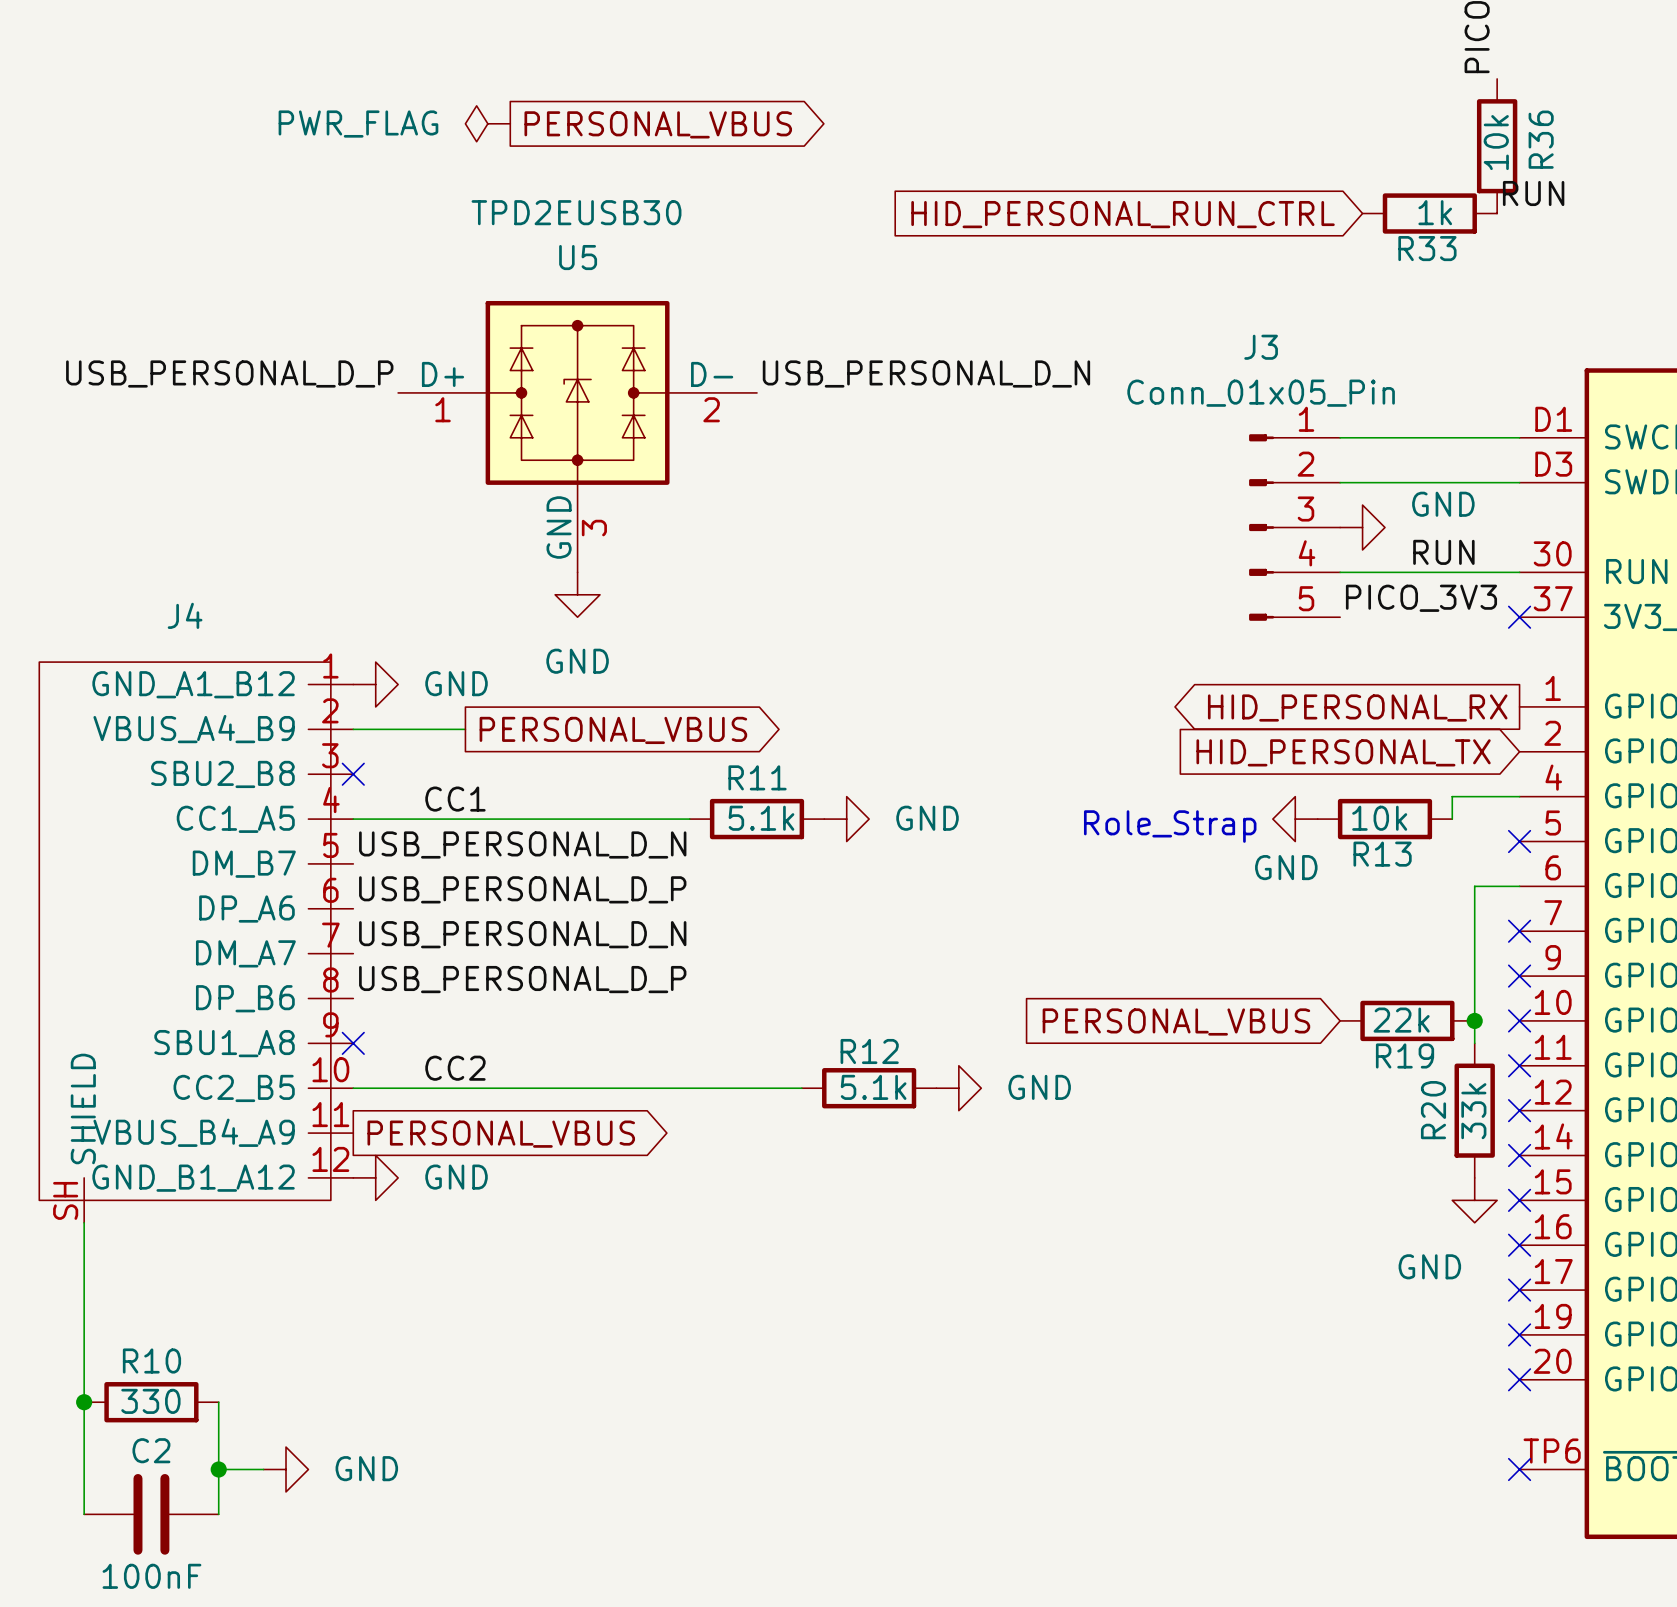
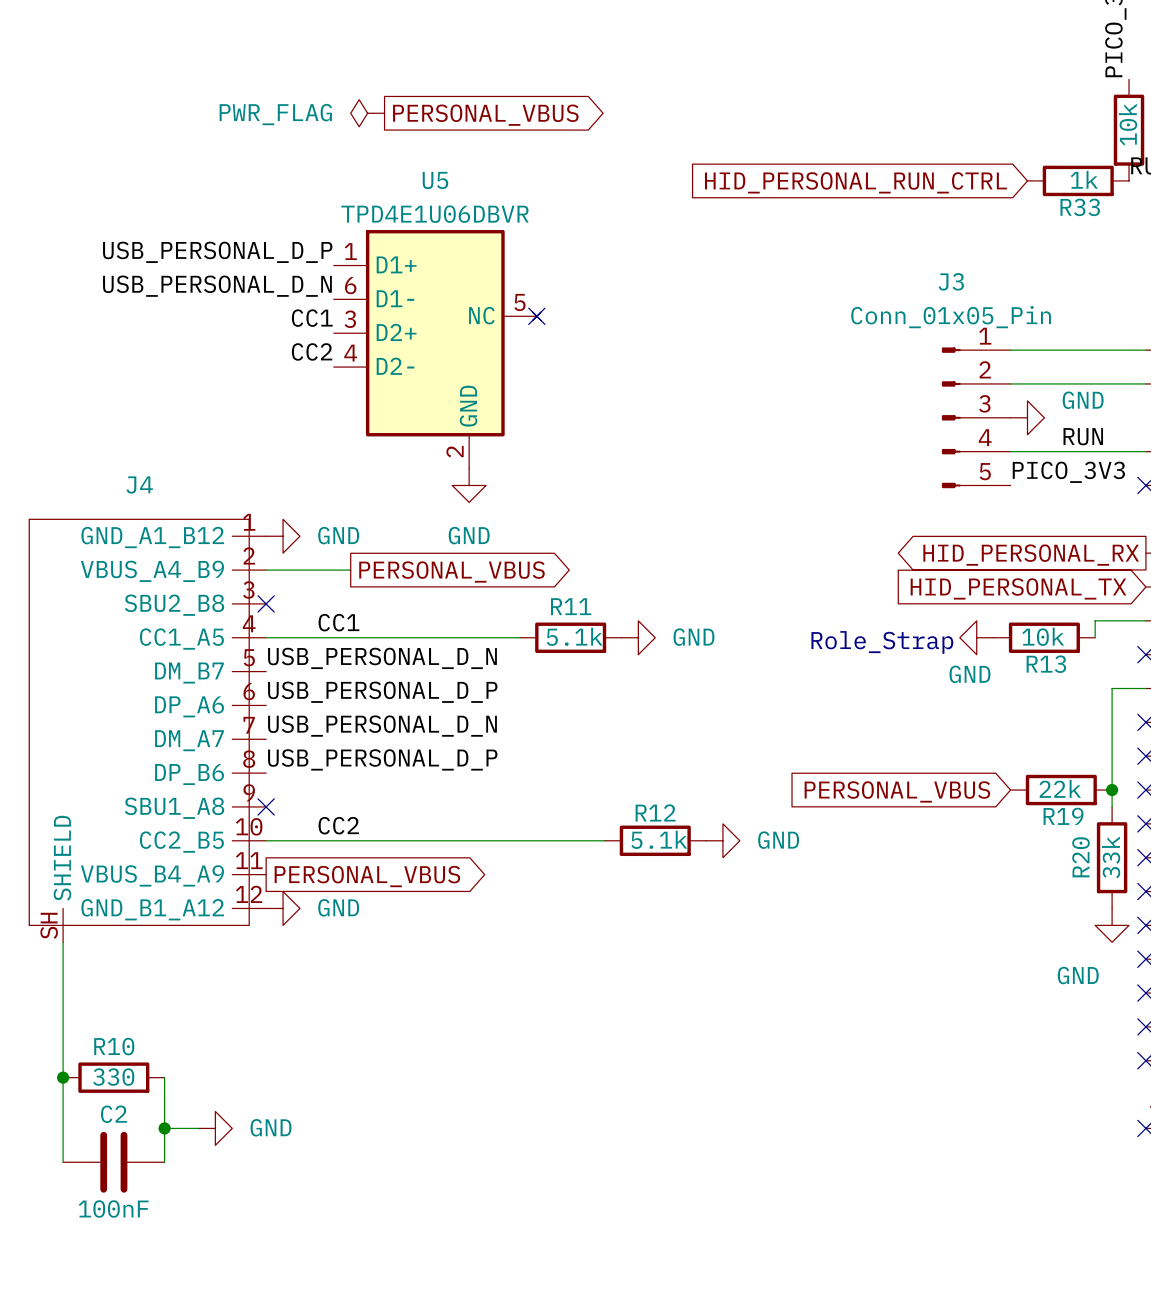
U5 value: TPD2EUSB30 (576, 212) -> TPD4E1U06DBVR (435, 214)
U5 name position: U5 (578, 257) -> U5 (435, 180)
U5 symbol: [398, 300, 758, 573] -> [333, 230, 541, 469]
label position: USB_PERSONAL_D_P (229, 373) -> USB_PERSONAL_D_P (217, 252)
label position: USB_PERSONAL_D_N (926, 373) -> USB_PERSONAL_D_N (217, 286)
no-connect mark: none -> (536, 316)
label: none -> CC1 (312, 318)
label: none -> CC2 (312, 351)
power symbol position: GND (577, 594) -> GND (469, 485)

